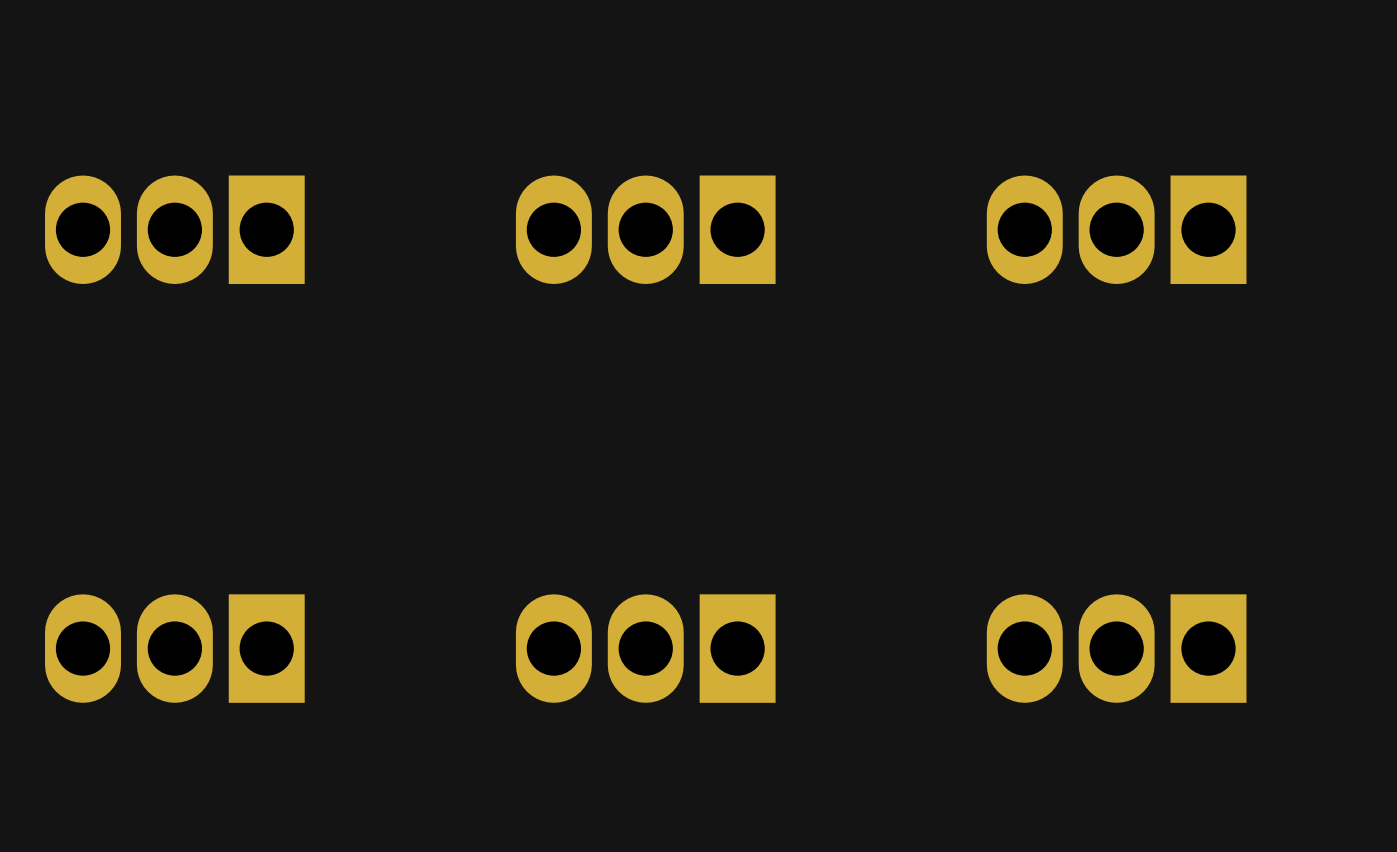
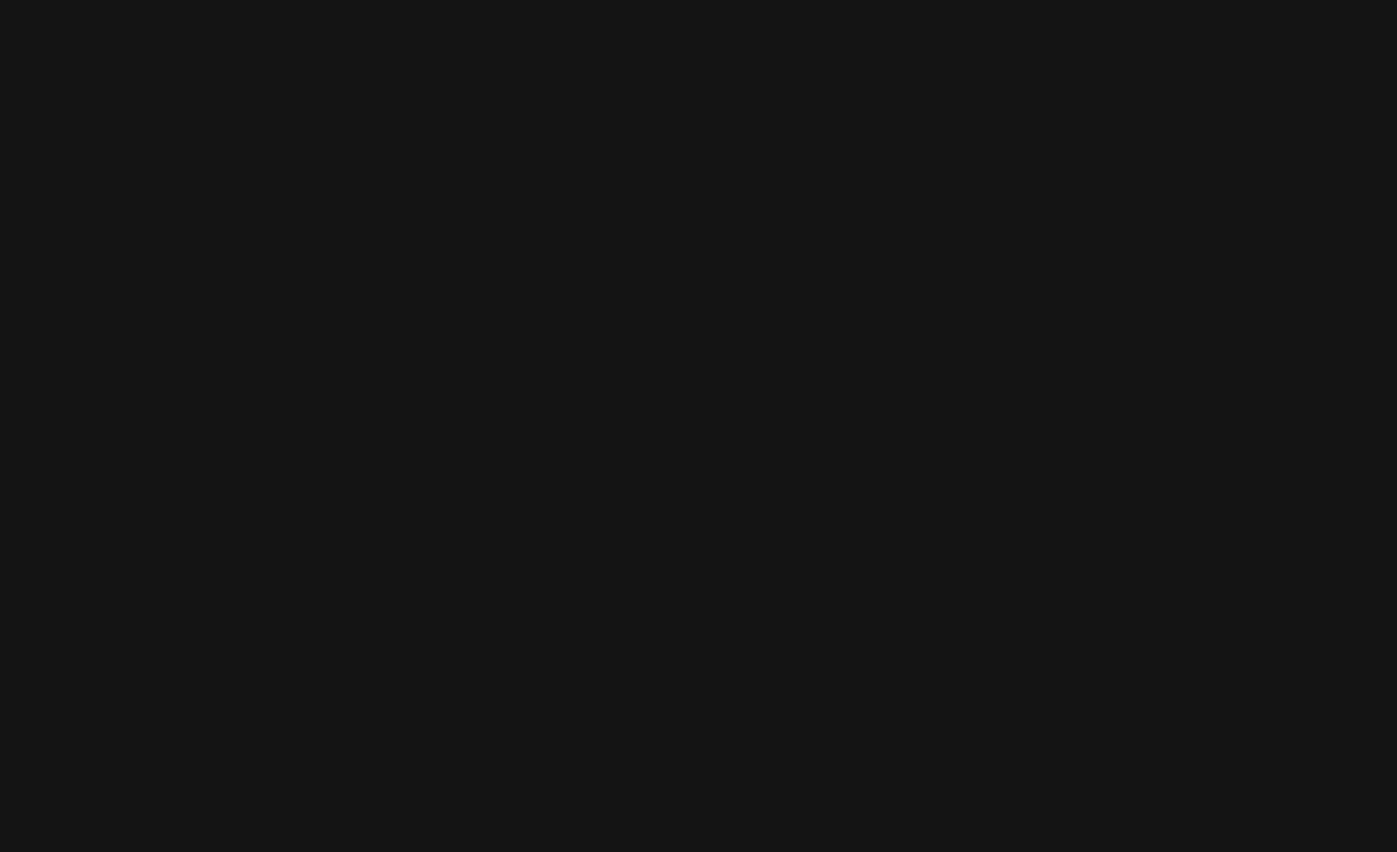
part: (174, 229) -> none
part: (645, 229) -> none
part: (1116, 229) -> none
part: (174, 648) -> none
part: (645, 648) -> none
part: (1116, 648) -> none

